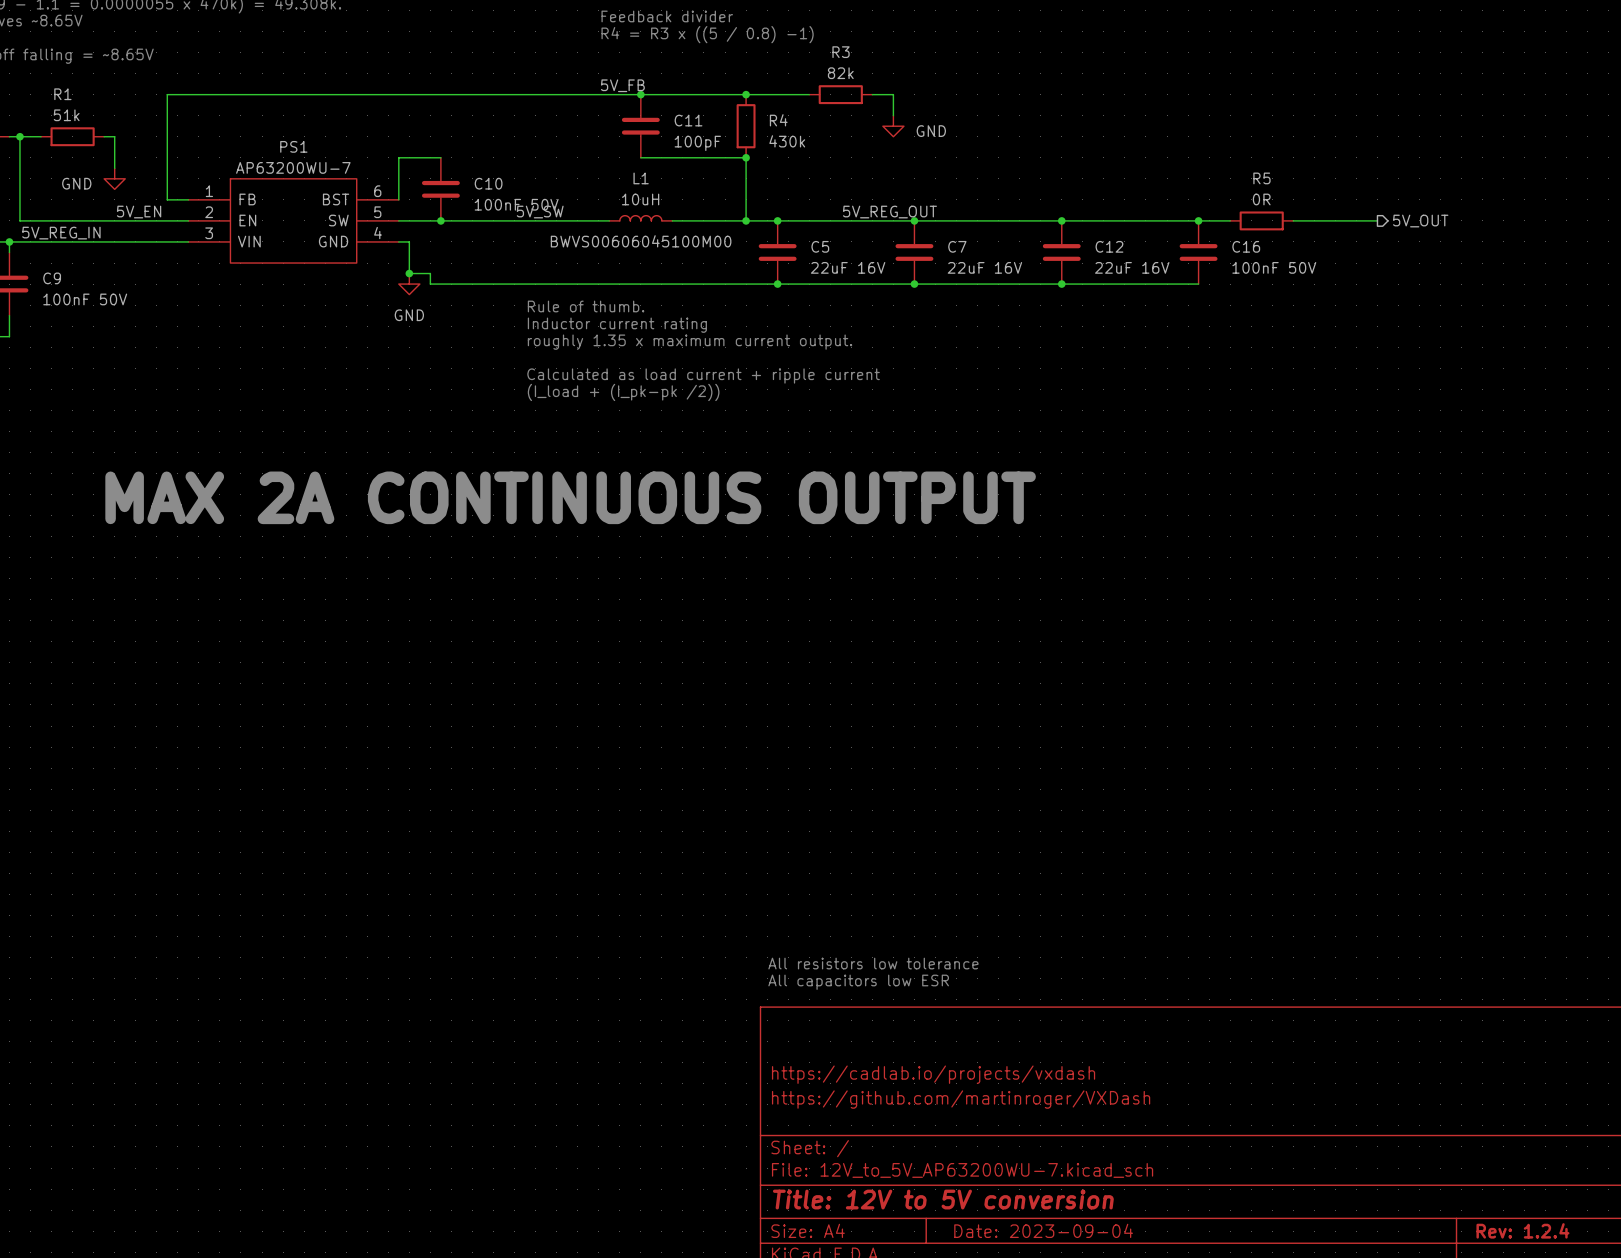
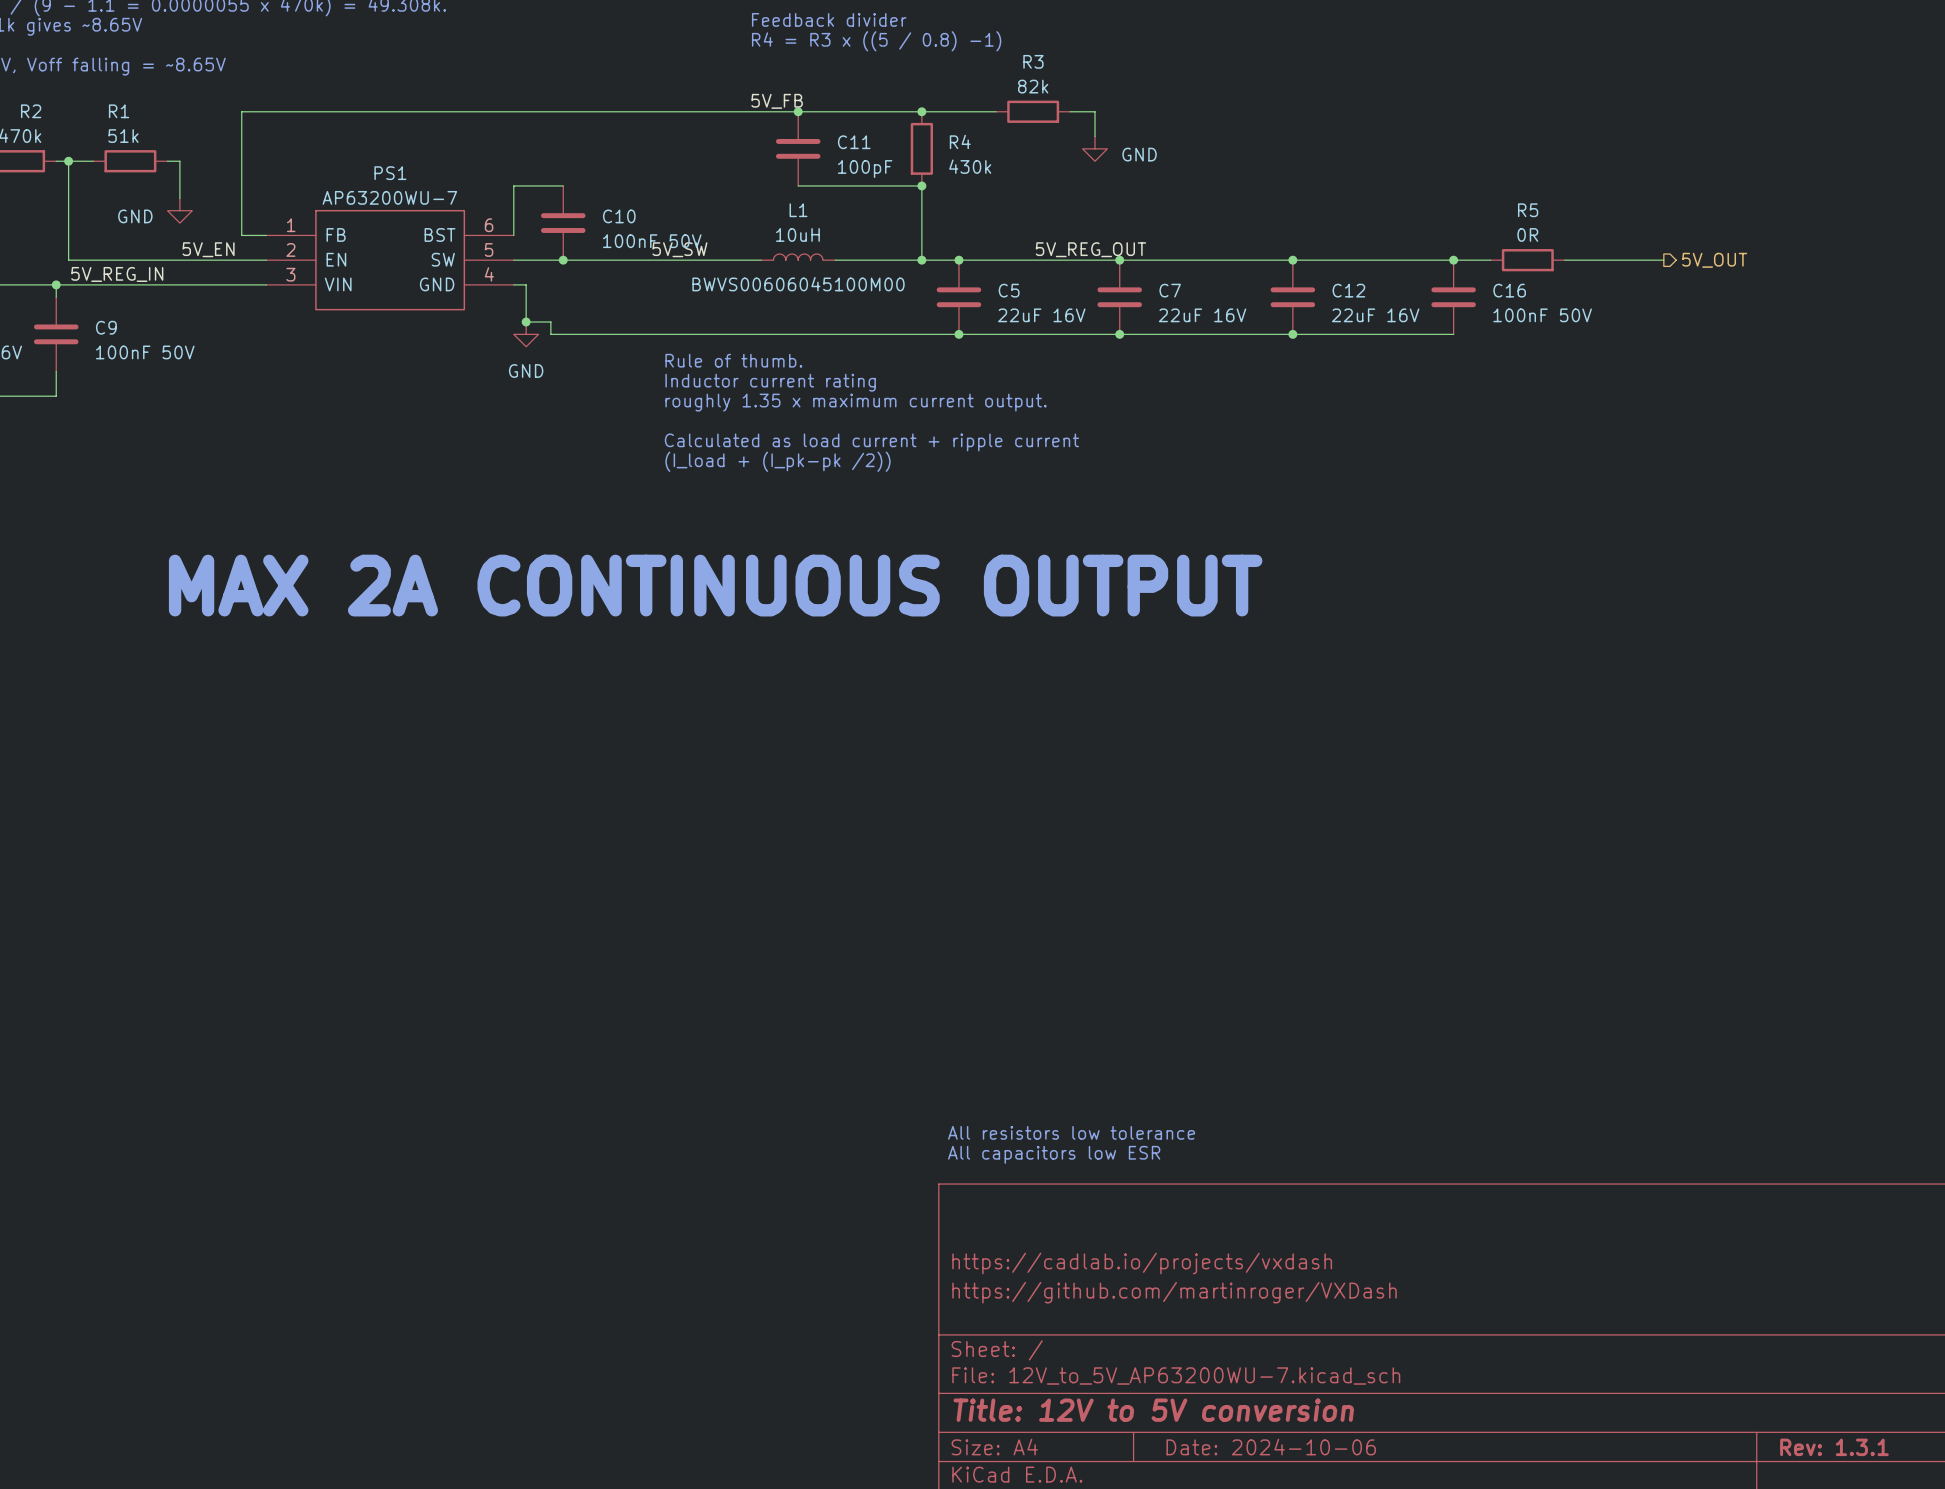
title block: Date: 2023-09-04 (1043, 1230) -> Date: 2024-10-06 (1271, 1447)
title block: Rev: 1.2.4 (1522, 1230) -> Rev: 1.3.1 (1834, 1447)

